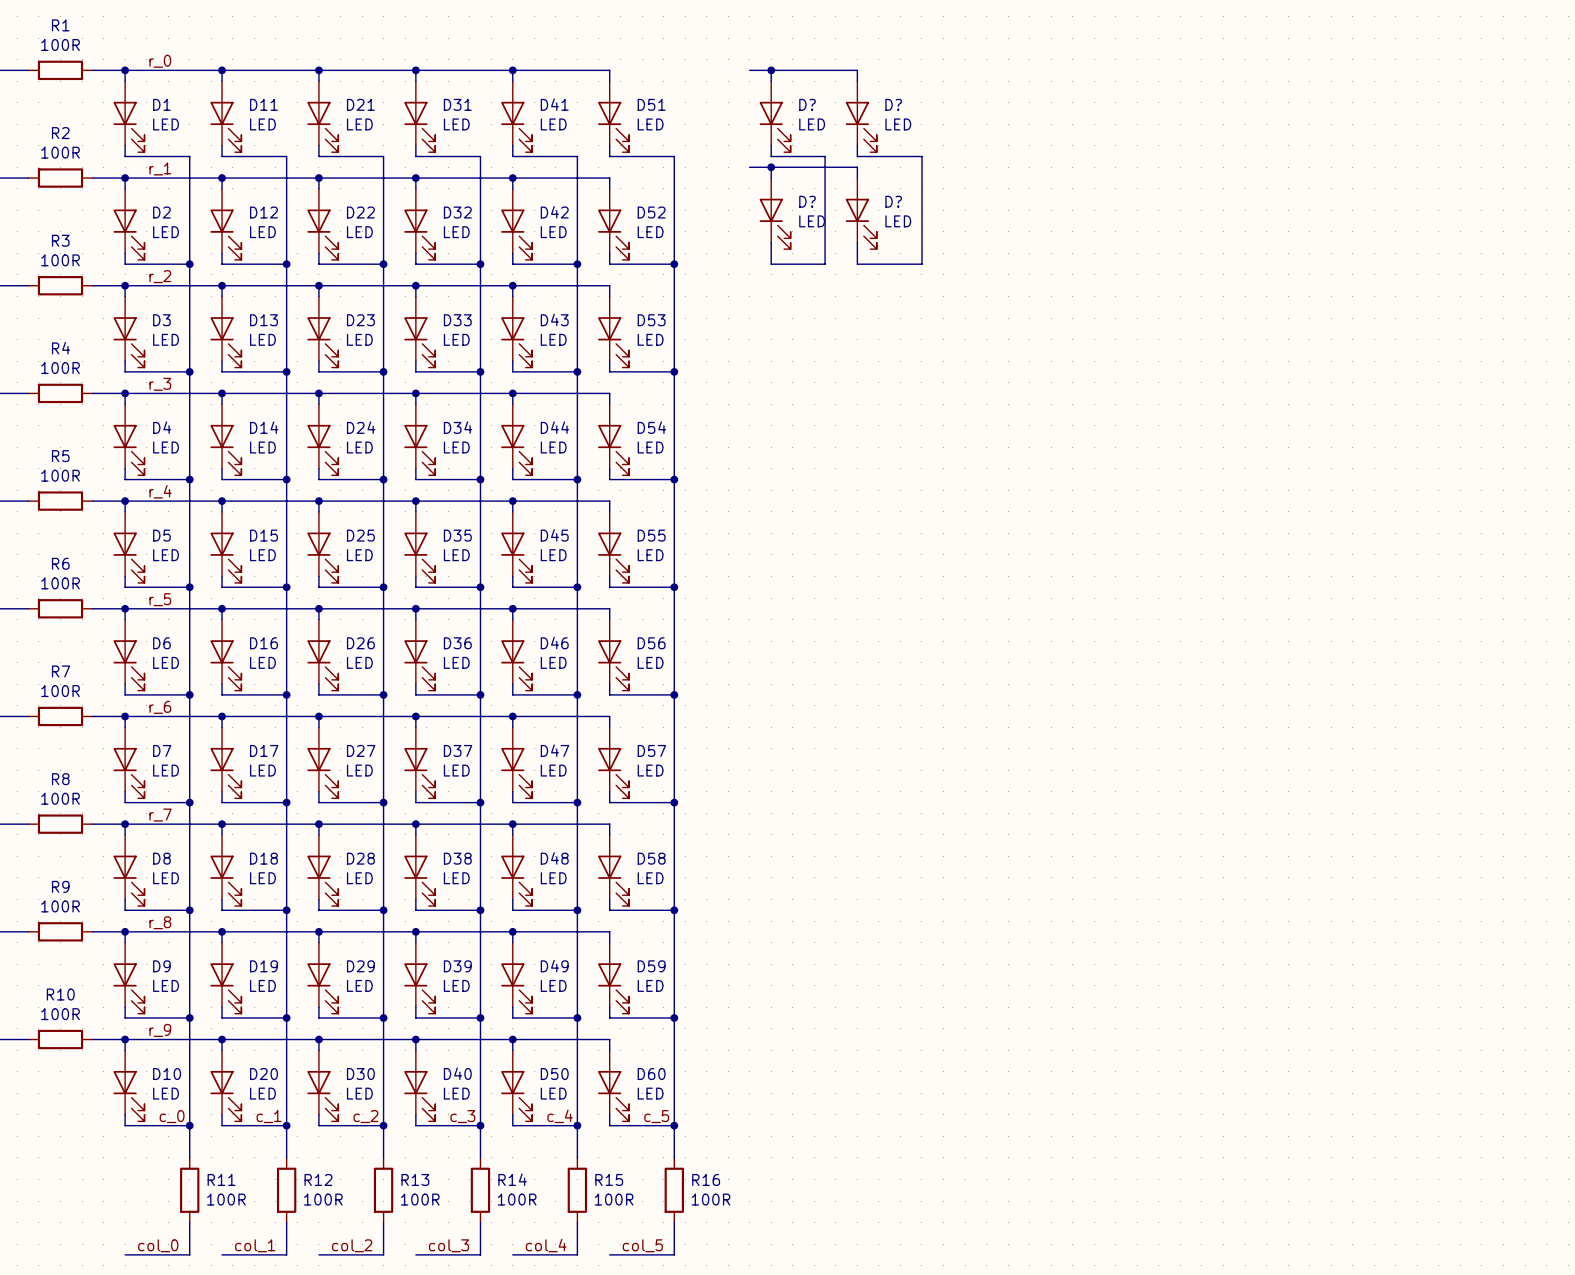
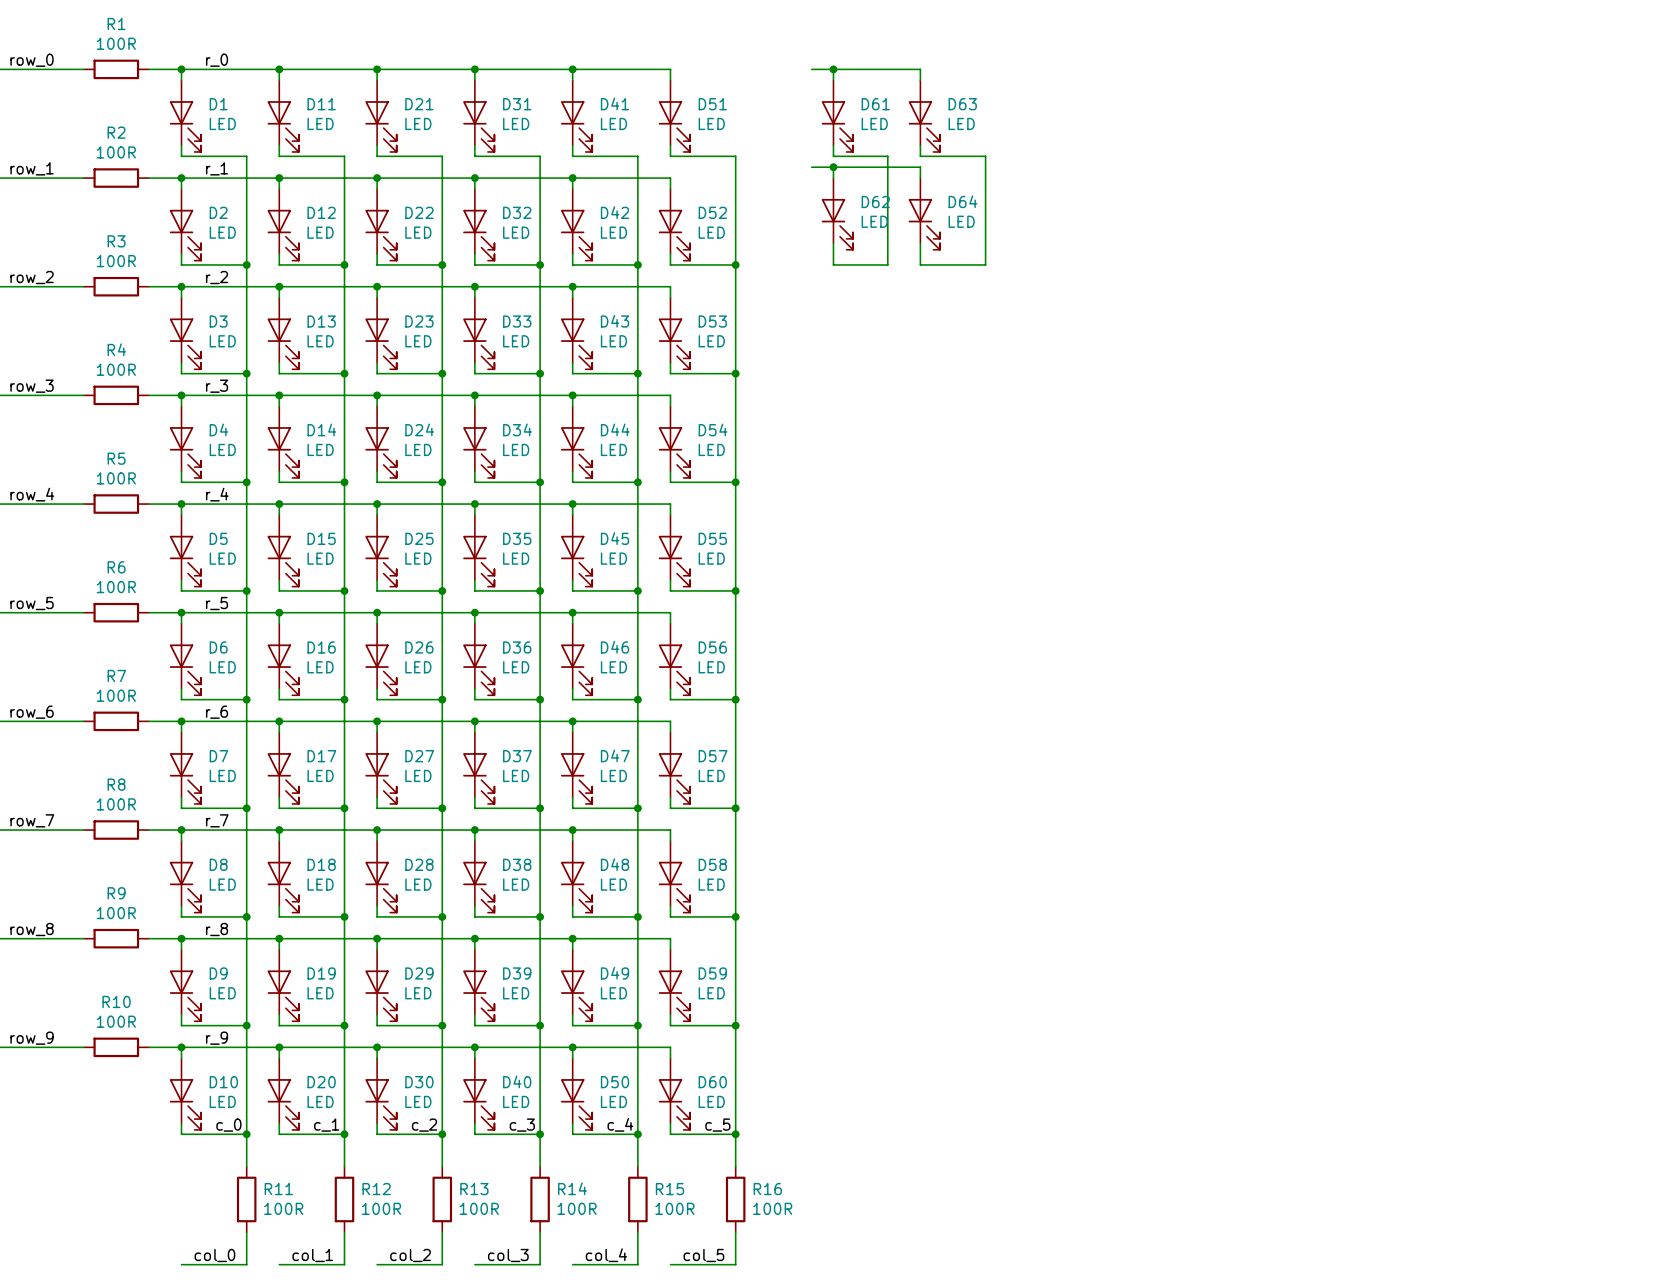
D? name: D? (807, 104) -> D61 (875, 104)
D? name: D? (893, 104) -> D63 (962, 104)
D? name: D? (807, 201) -> D62 (875, 201)
D? name: D? (893, 201) -> D64 (962, 201)

